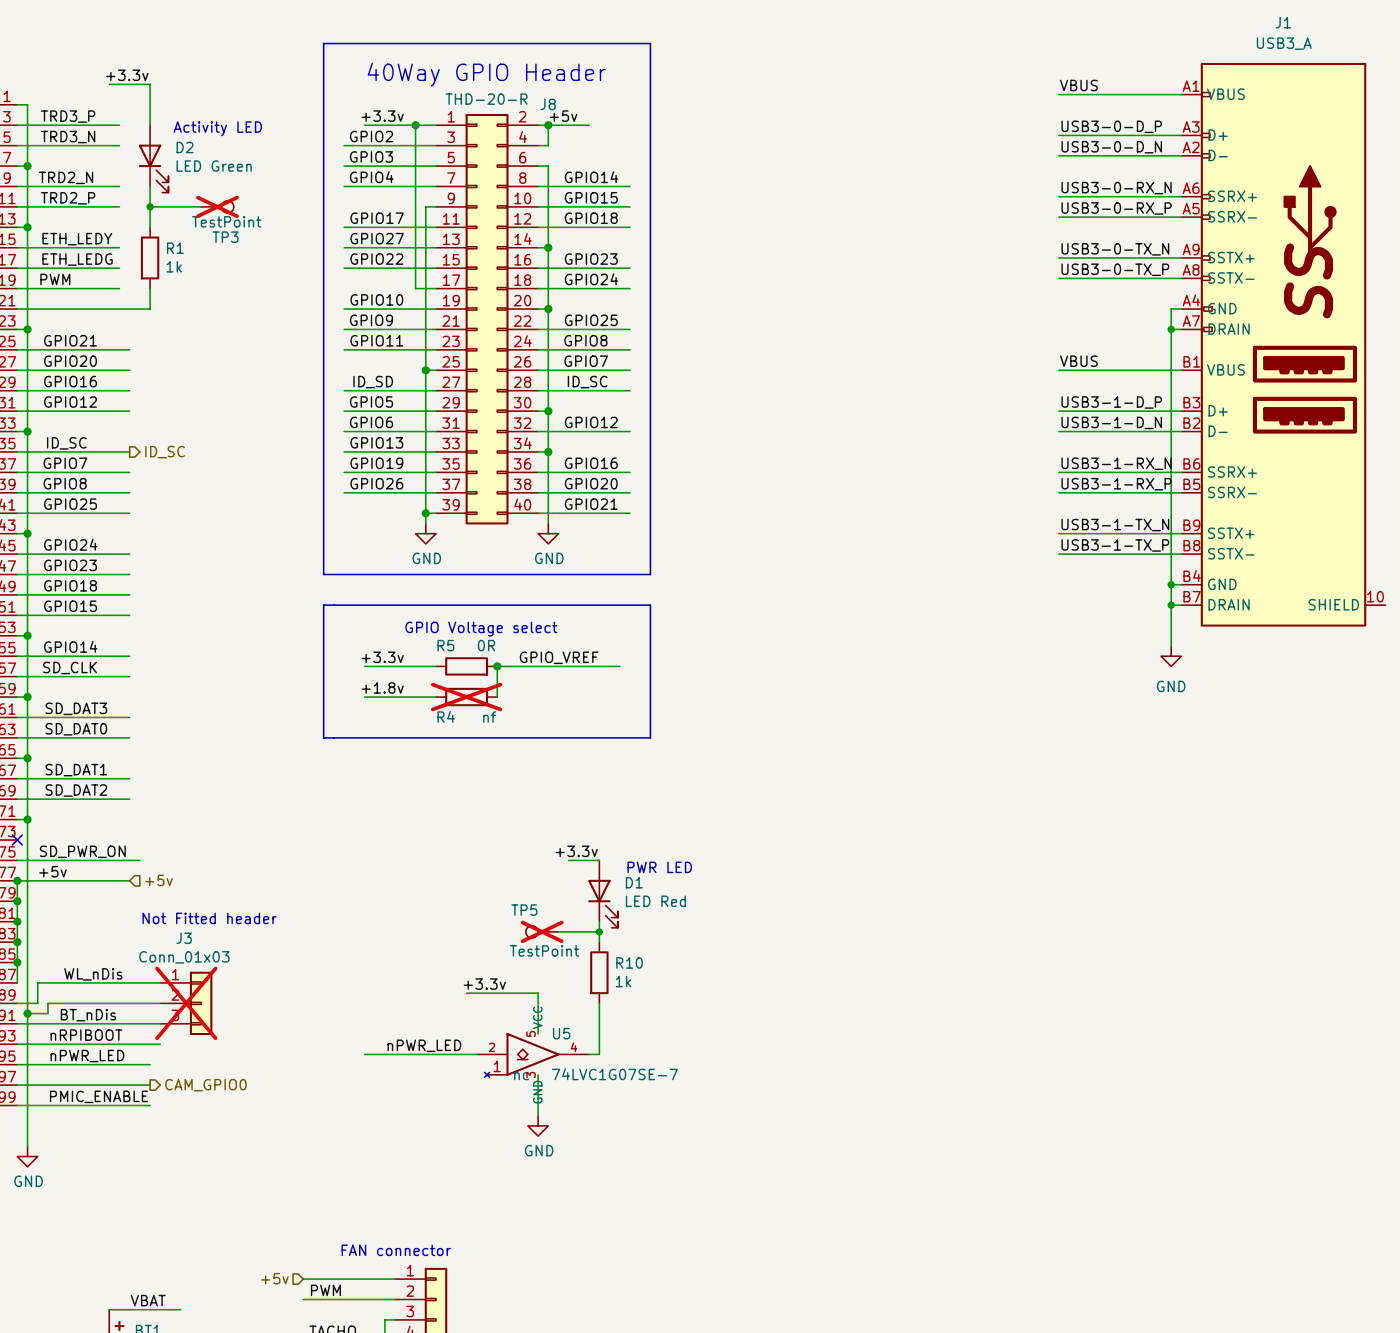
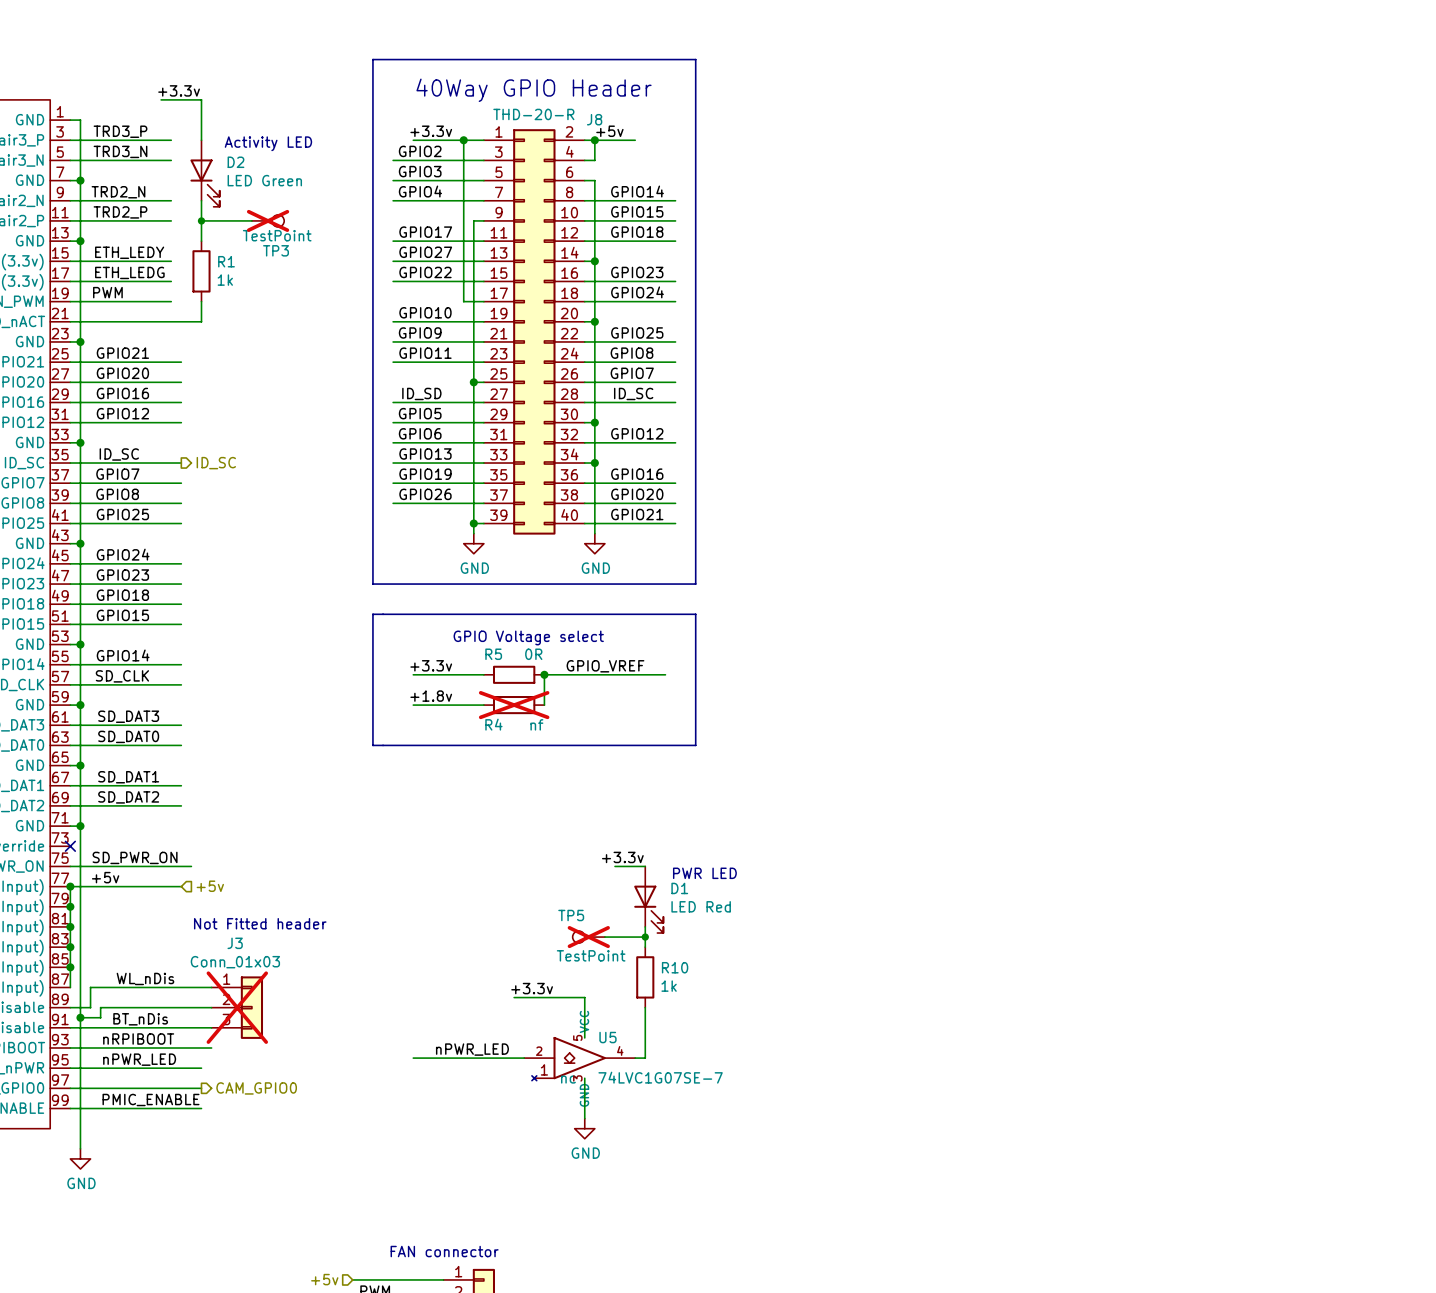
label: VBUS (1078, 85) -> none
wire: (1058, 94) (1181, 94) -> none
label: USB3-0-D_P (1111, 126) -> none
wire: (1058, 135) (1181, 135) -> none
label: USB3-0-D_N (1111, 147) -> none
wire: (1058, 155) (1181, 155) -> none
label: USB3-0-RX_N (1116, 188) -> none
wire: (1058, 196) (1181, 196) -> none
label: USB3-0-RX_P (1116, 208) -> none
wire: (1058, 217) (1181, 217) -> none
label: USB3-0-TX_N (1115, 249) -> none
wire: (1058, 257) (1181, 257) -> none
label: USB3-0-TX_P (1115, 269) -> none
wire: (1058, 278) (1181, 278) -> none
wire: (1181, 309) (1171, 309) (1171, 645) -> none
wire: (1171, 329) (1181, 329) -> none
junction: (1171, 329) -> none
J1: USB3_A (1283, 344) -> none
label: VBUS (1078, 361) -> none
wire: (1058, 370) (1181, 370) -> none
label: USB3-1-D_P (1111, 402) -> none
wire: (1058, 411) (1181, 411) -> none
label: USB3-1-D_N (1111, 422) -> none
wire: (1058, 431) (1181, 431) -> none
label: USB3-1-RX_N (1116, 463) -> none
wire: (1058, 472) (1181, 472) -> none
label: USB3-1-RX_P (1116, 484) -> none
wire: (1058, 492) (1181, 492) -> none
label: USB3-1-TX_N (1115, 525) -> none
wire: (1058, 533) (1181, 533) -> none
label: USB3-1-TX_P (1115, 545) -> none
wire: (1058, 554) (1181, 554) -> none
wire: (1171, 584) (1181, 584) -> none
junction: (1171, 584) -> none
wire: (1171, 605) (1181, 605) -> none
junction: (1171, 605) -> none
power symbol: GND (1171, 656) -> none

